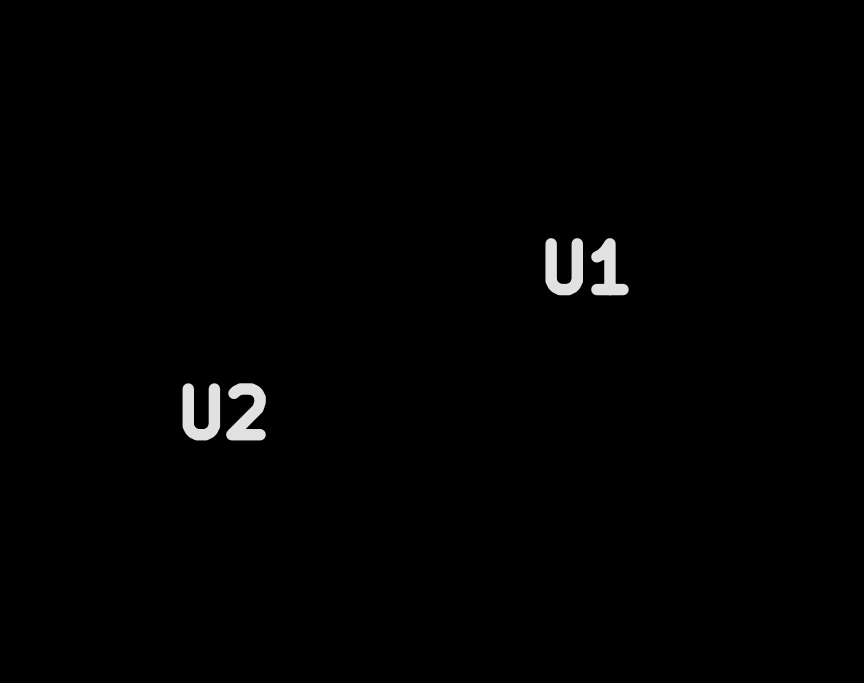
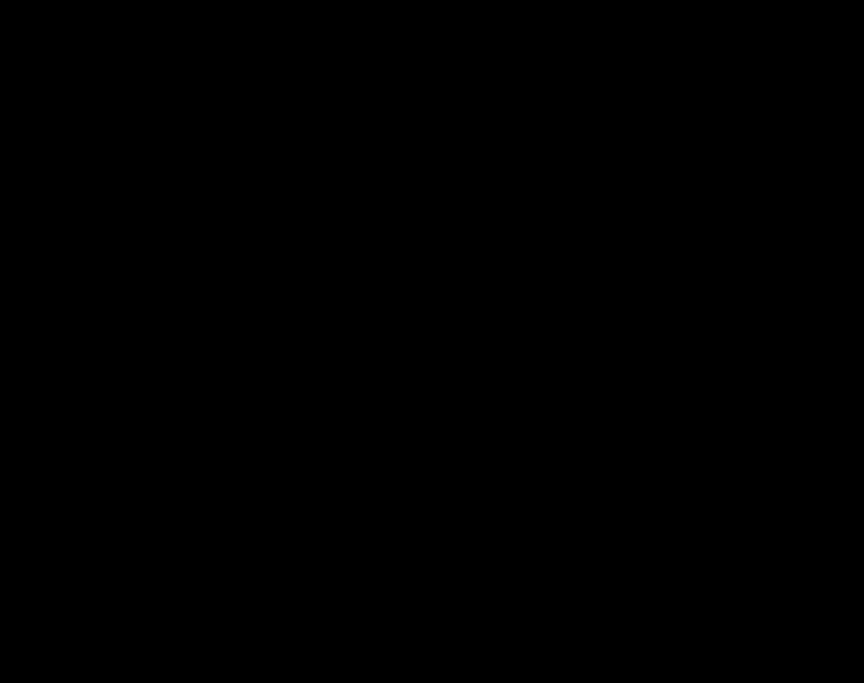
text: U1 (587, 266) -> none
text: U2 (224, 411) -> none

